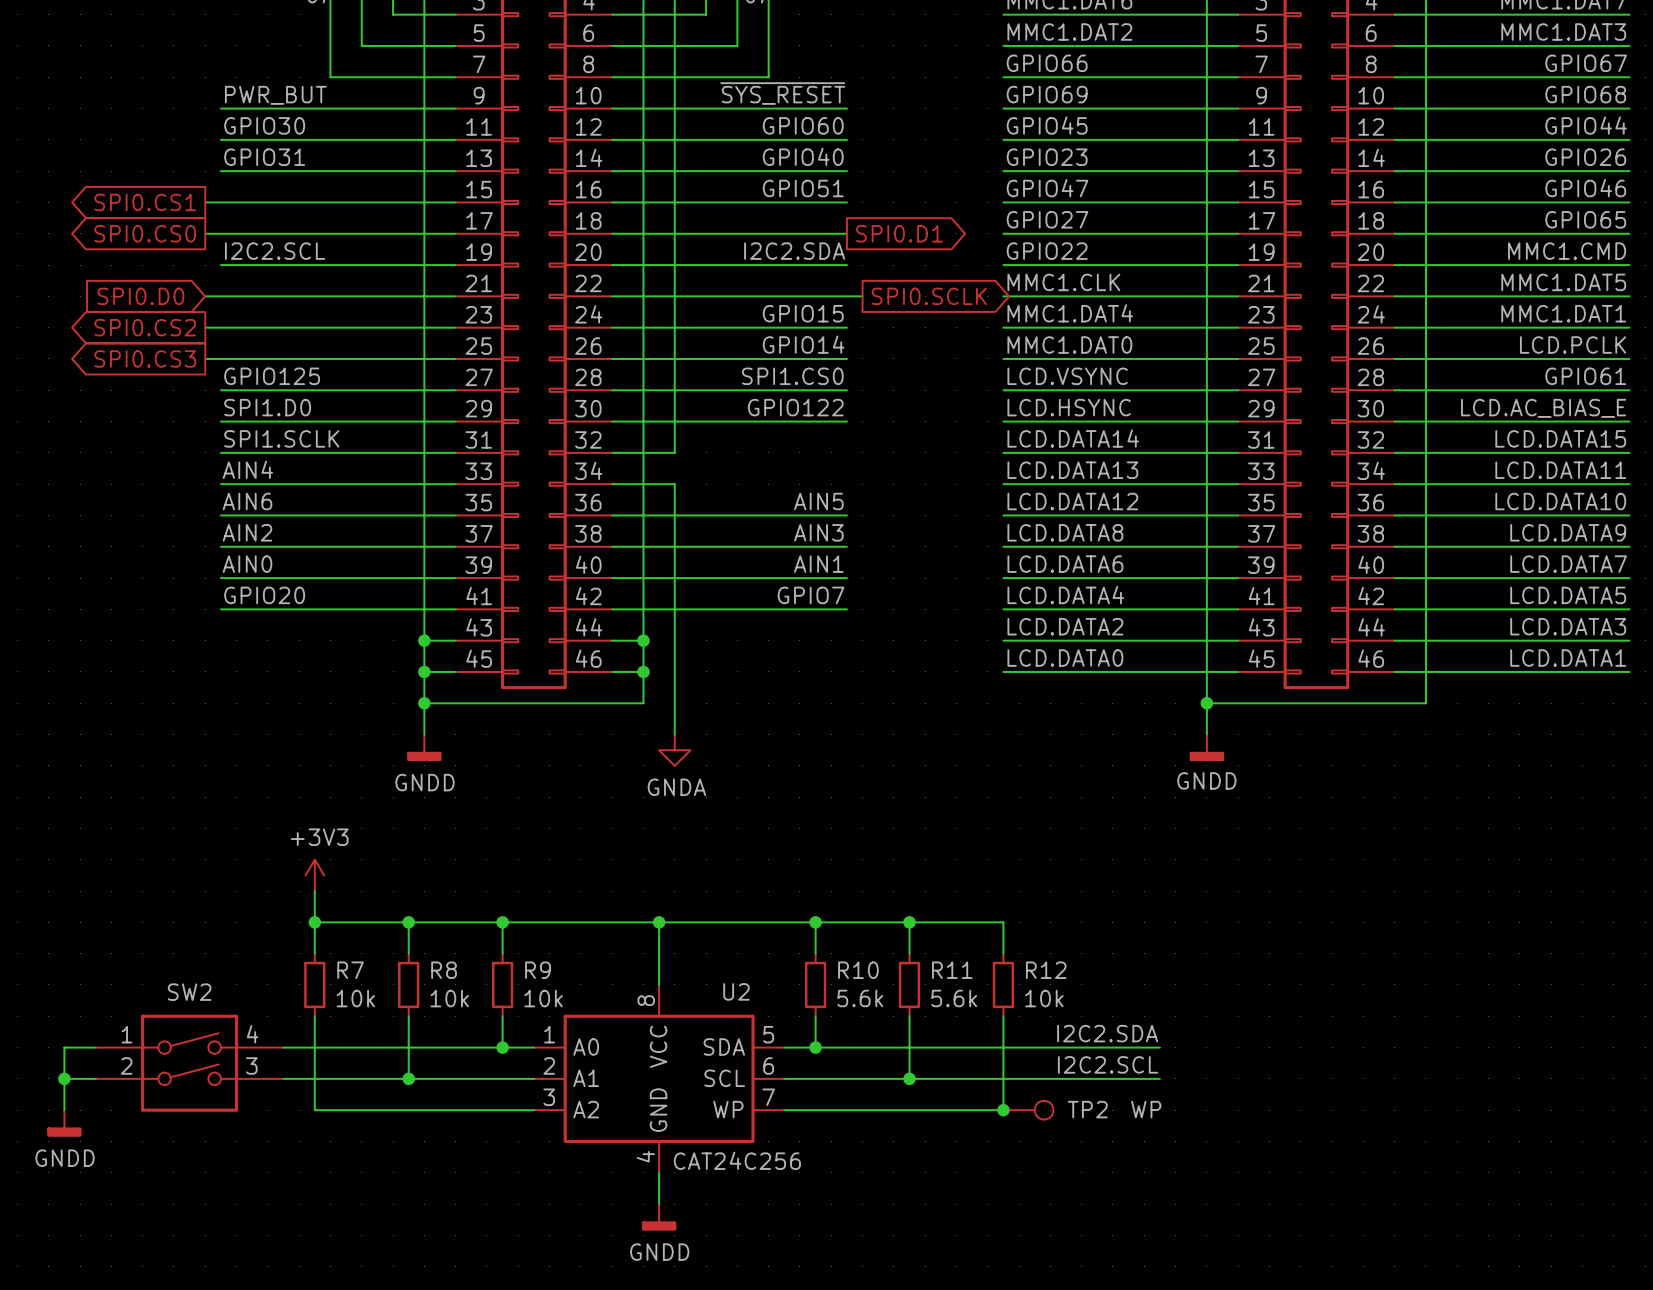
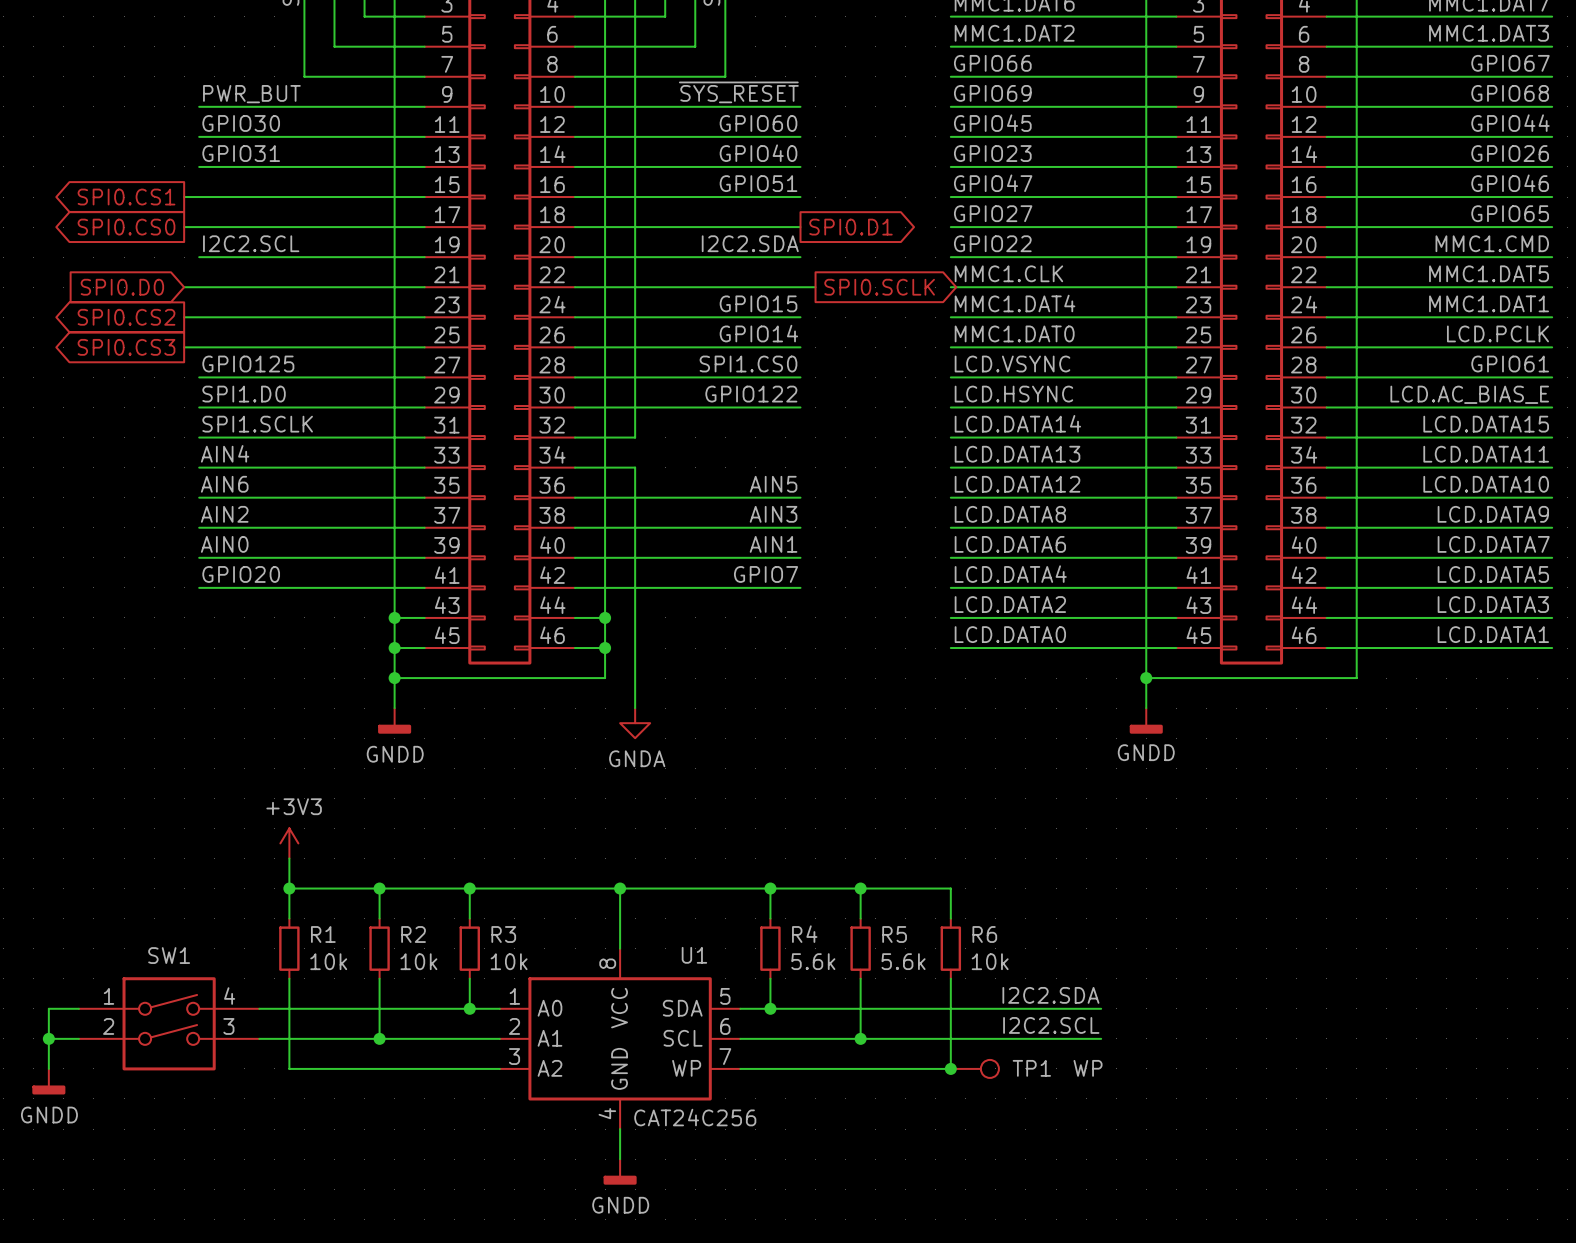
R7 name: R7 (350, 970) -> R1 (323, 934)
R8 name: R8 (444, 970) -> R2 (413, 934)
R9 name: R9 (537, 970) -> R3 (503, 934)
R10 name: R10 (858, 970) -> R4 (804, 934)
R11 name: R11 (952, 970) -> R5 (894, 934)
R12 name: R12 (1046, 970) -> R6 (984, 934)
U2 name: U2 (736, 991) -> U1 (694, 955)
SW2 name: SW2 (189, 992) -> SW1 (169, 955)
TP2 name: TP2 (1087, 1109) -> TP1 (1031, 1068)

